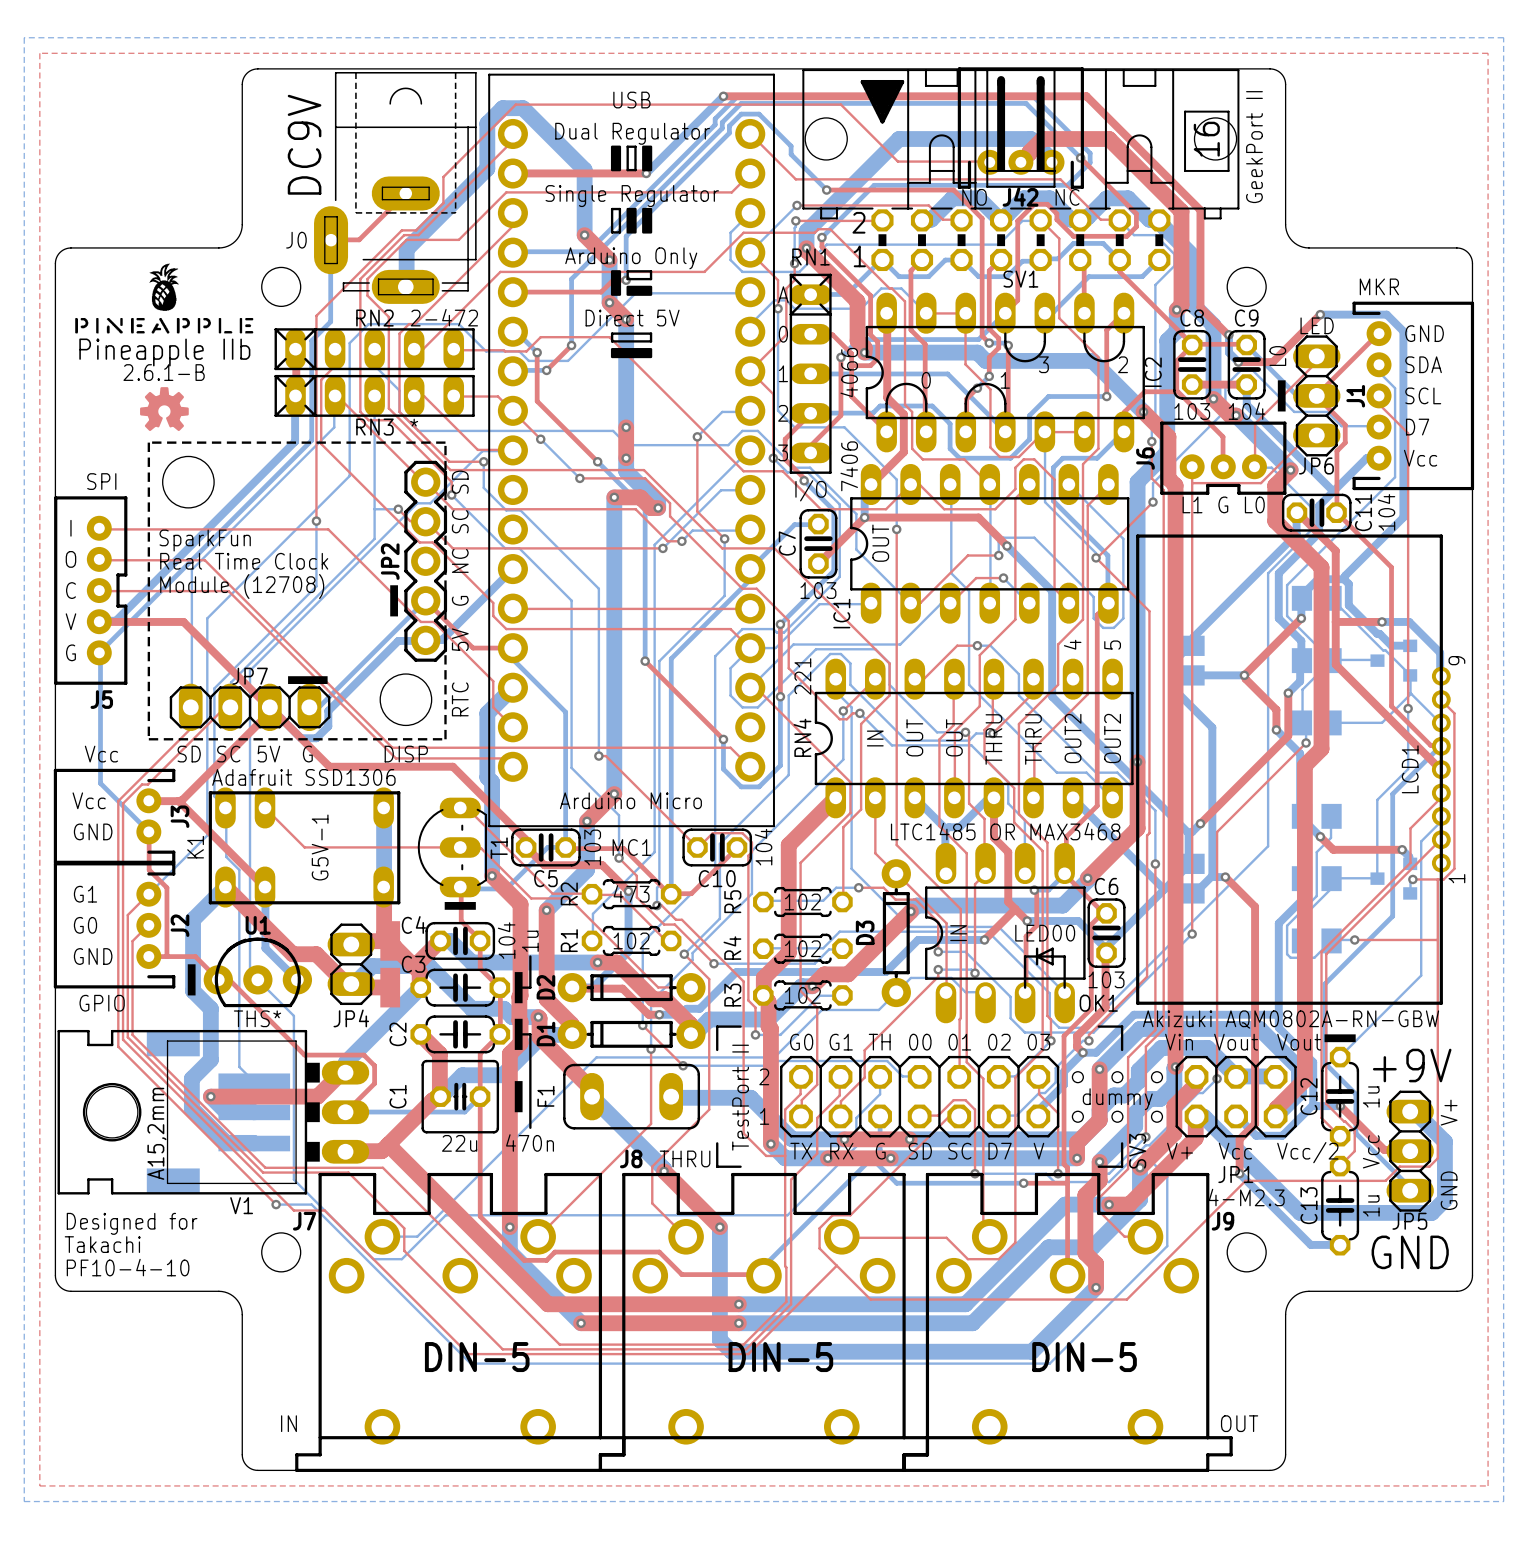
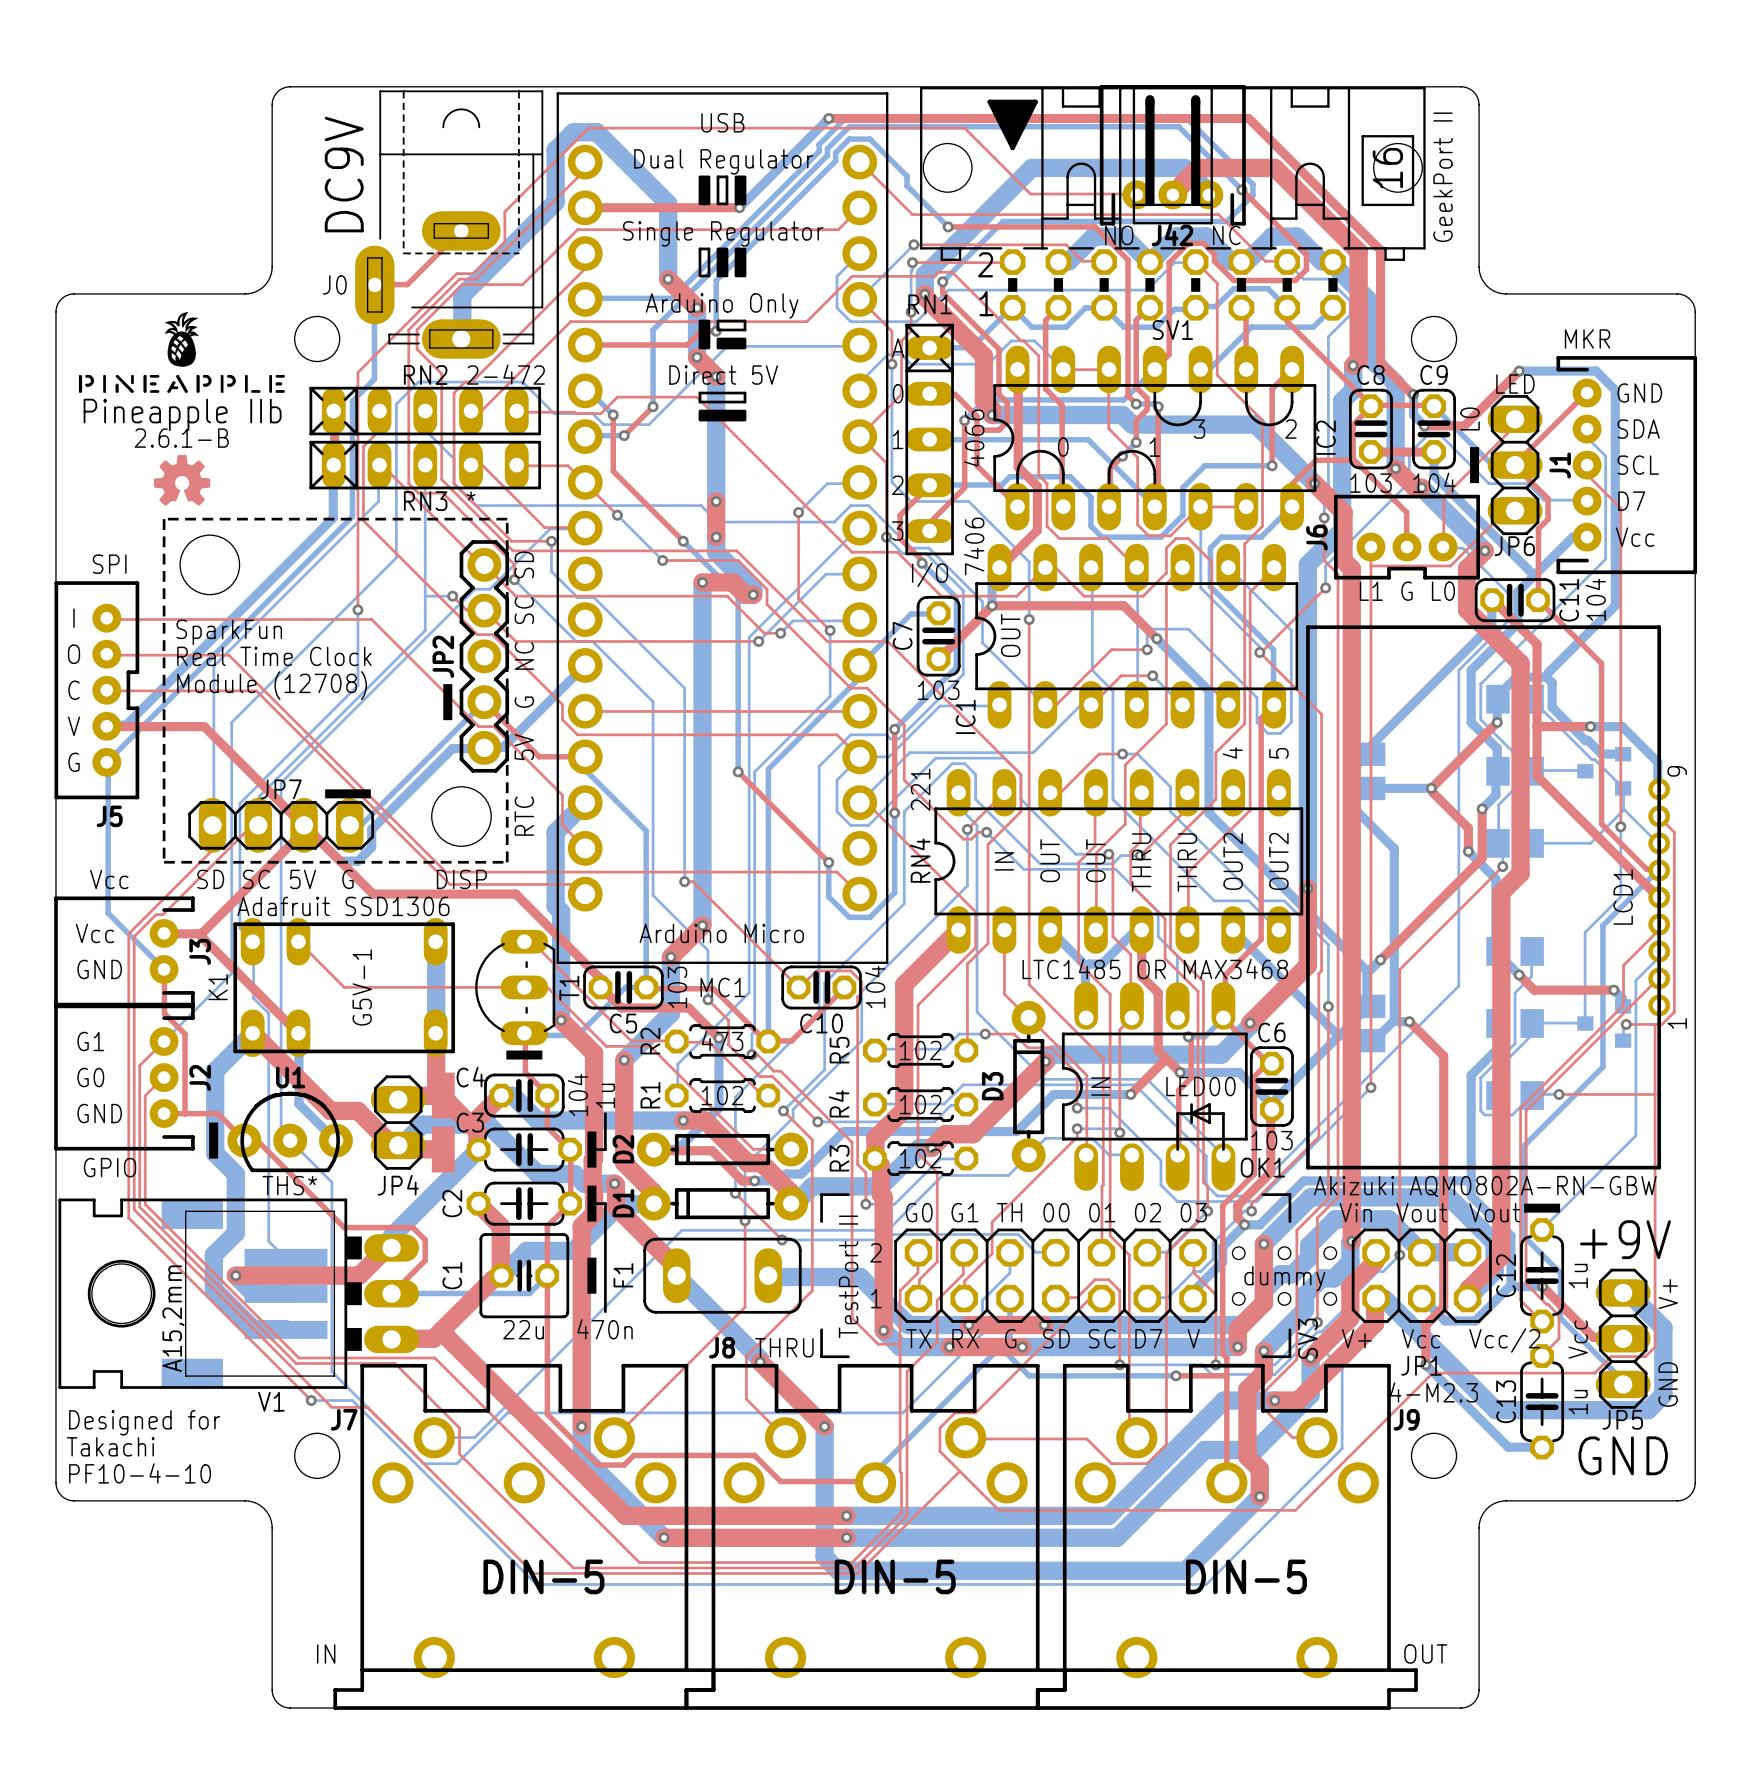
bottom zone outline: (24, 37) (1503, 37) (1503, 1501) (24, 1501) (24, 37) -> none
top zone outline: (39, 53) (1488, 53) (1488, 1485) (39, 1485) (39, 53) -> none

